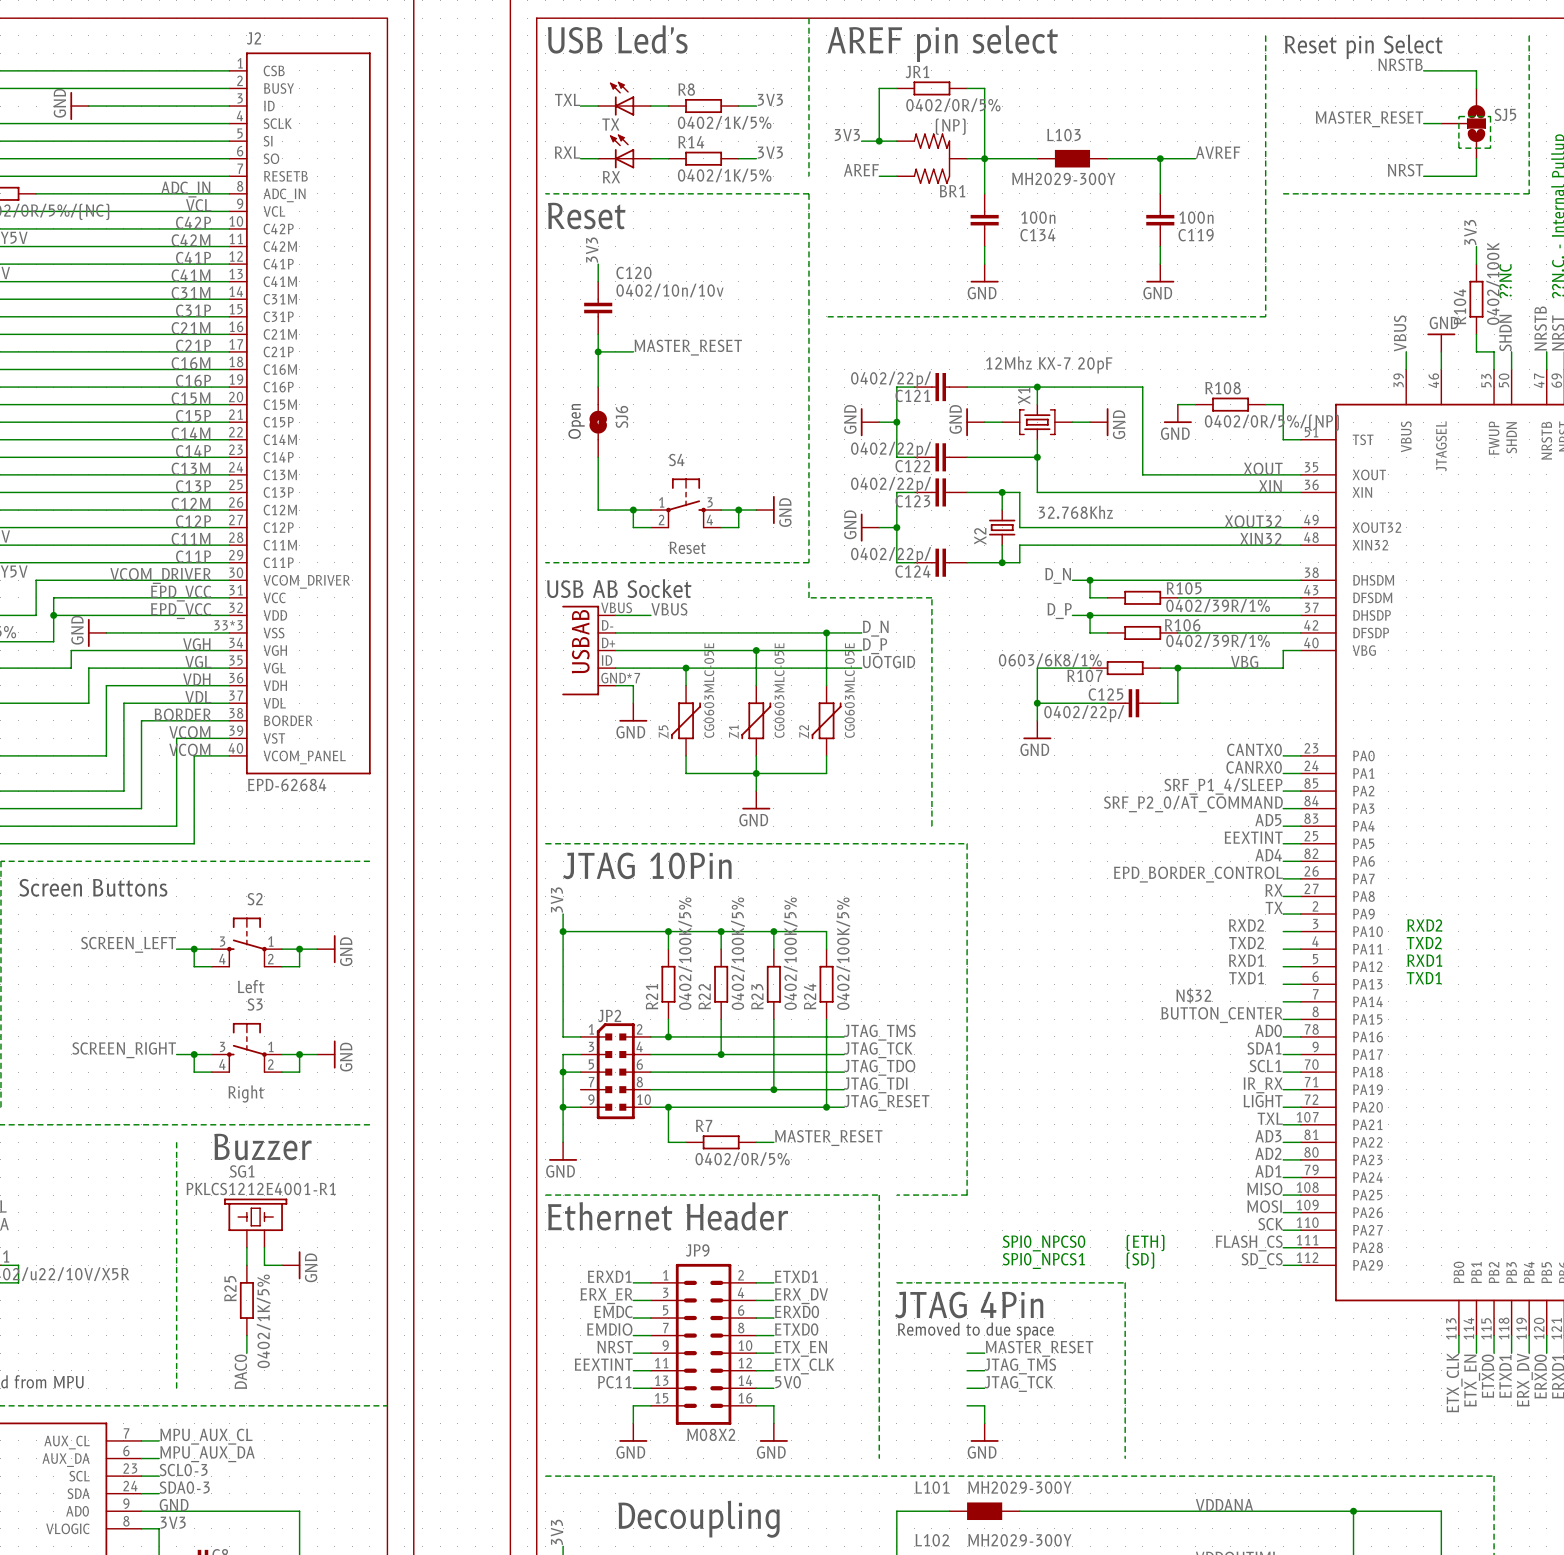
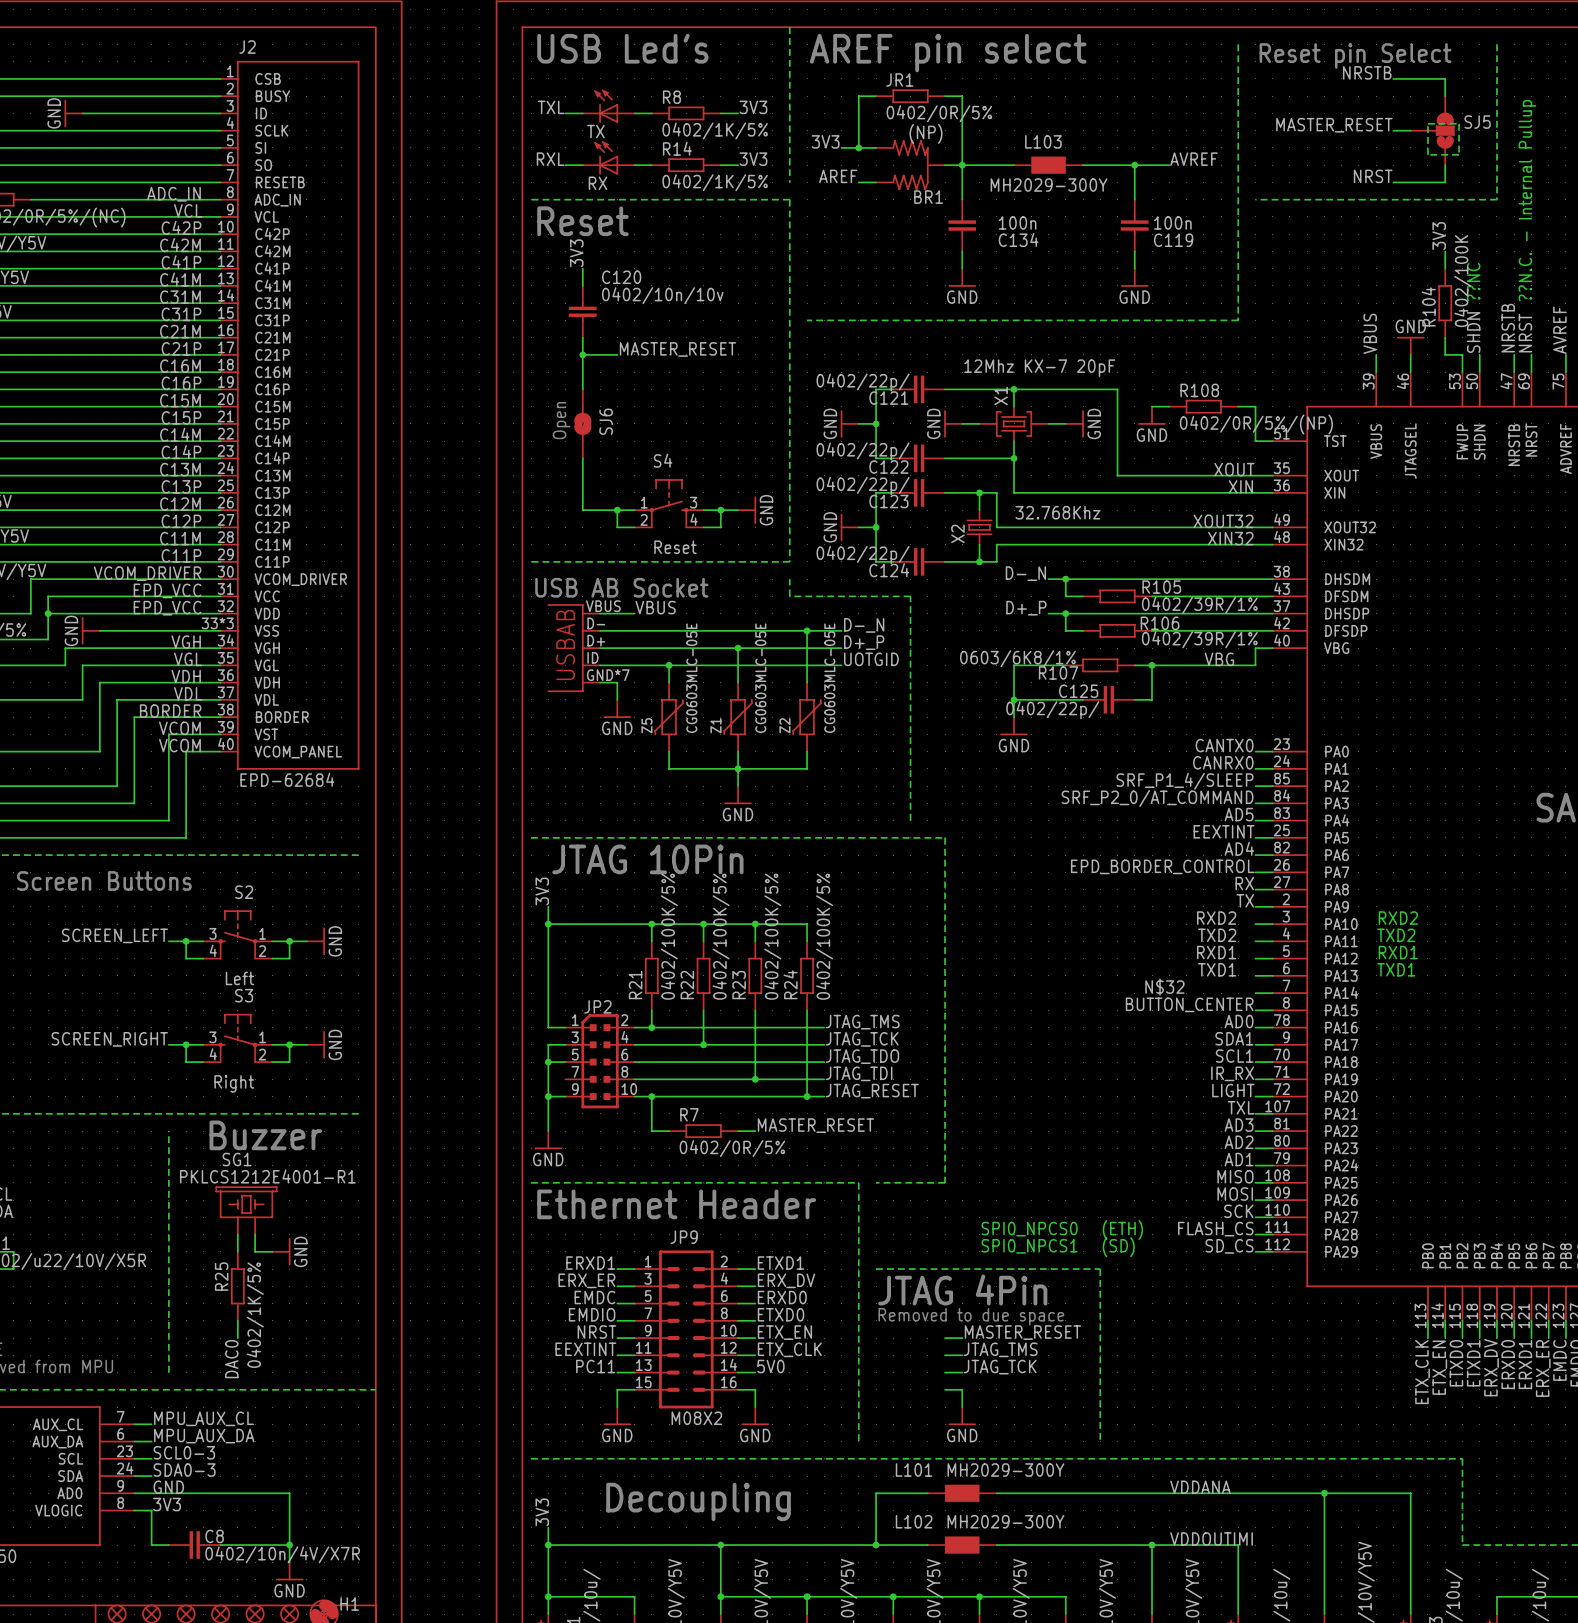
label: D_N (1058, 575) -> D-_N (1025, 573)
label: D_P (1059, 611) -> D+_P (1026, 608)
label: D_N (875, 628) -> D-_N (864, 625)
label: D_P (875, 646) -> D+_P (864, 642)

